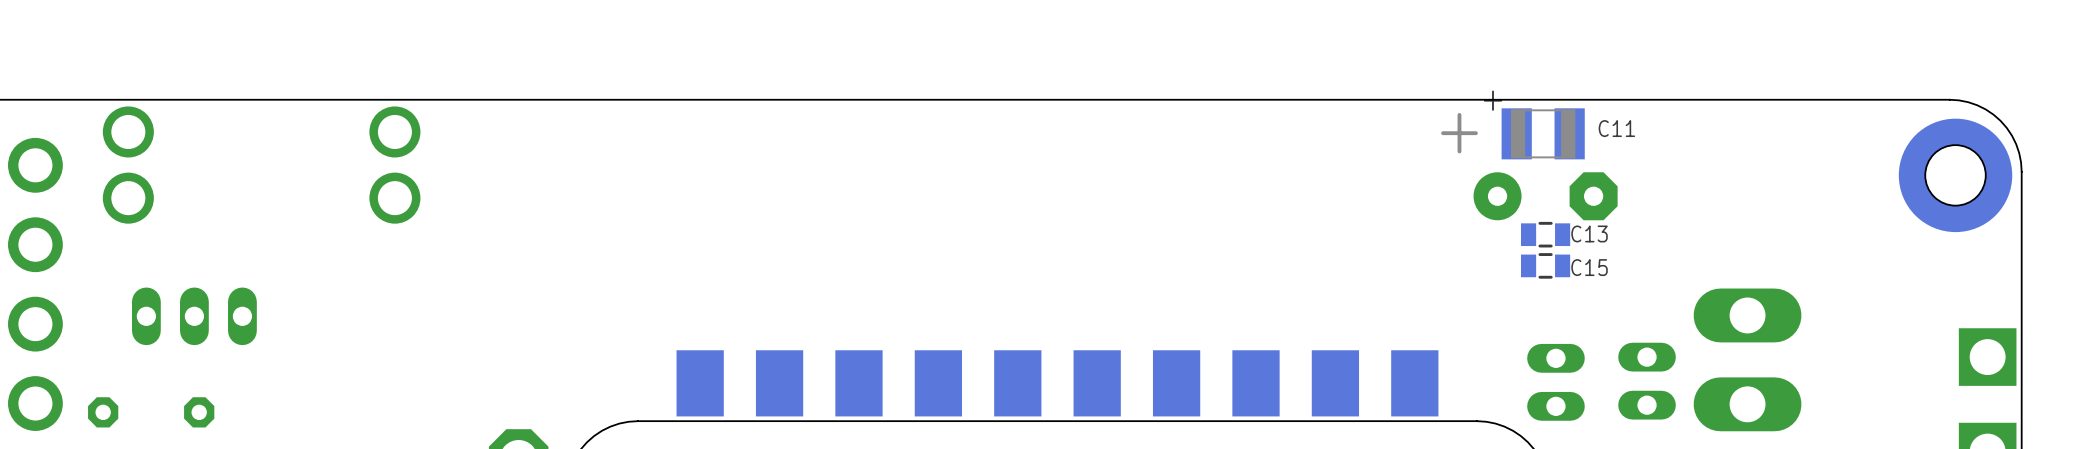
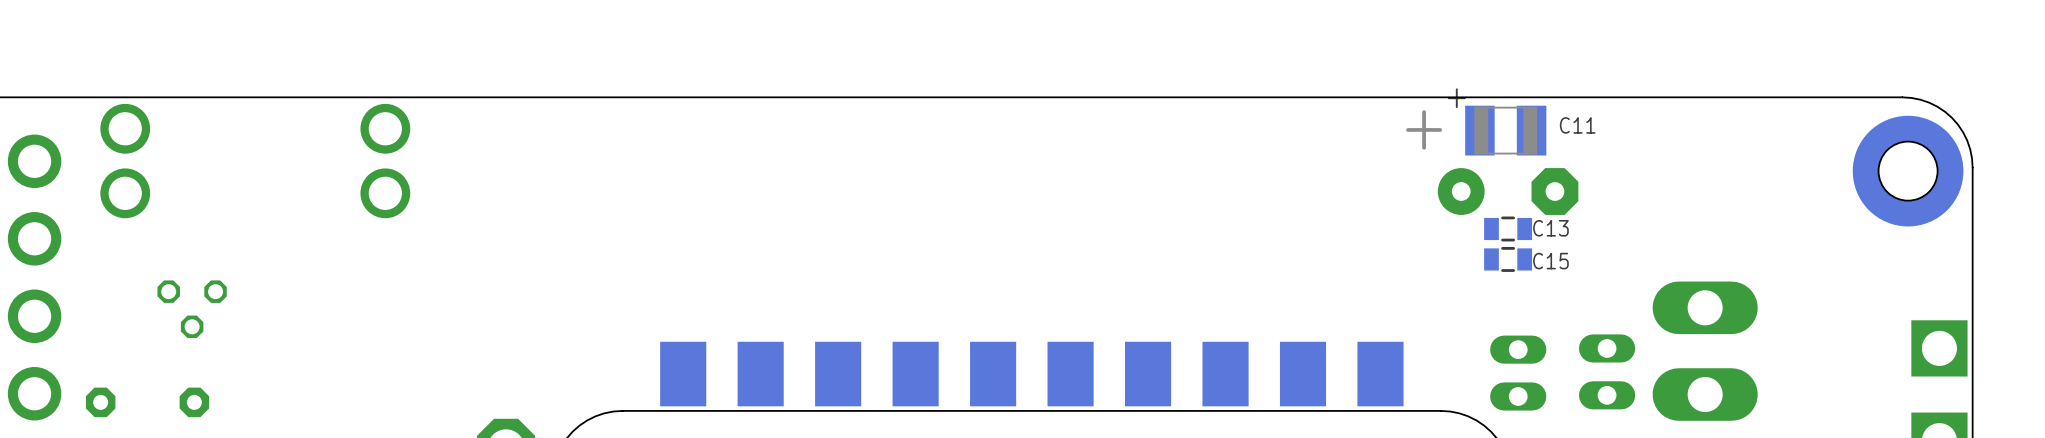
part footprint: [131, 287, 257, 346] -> [157, 280, 227, 339]

